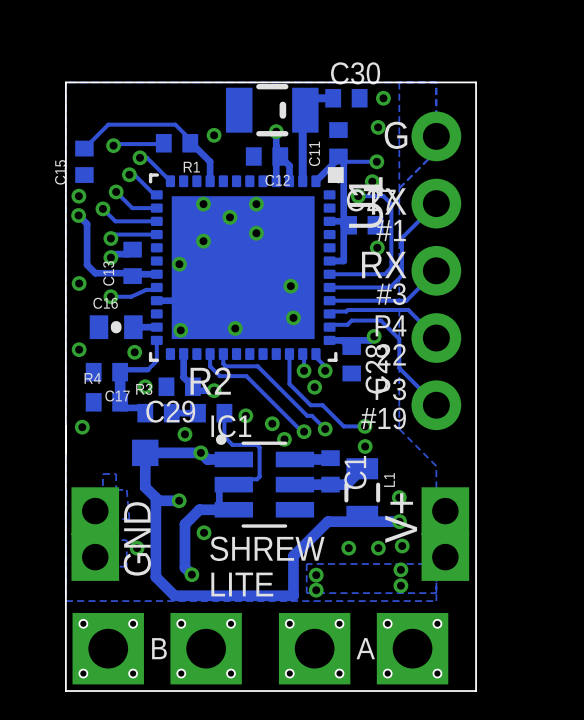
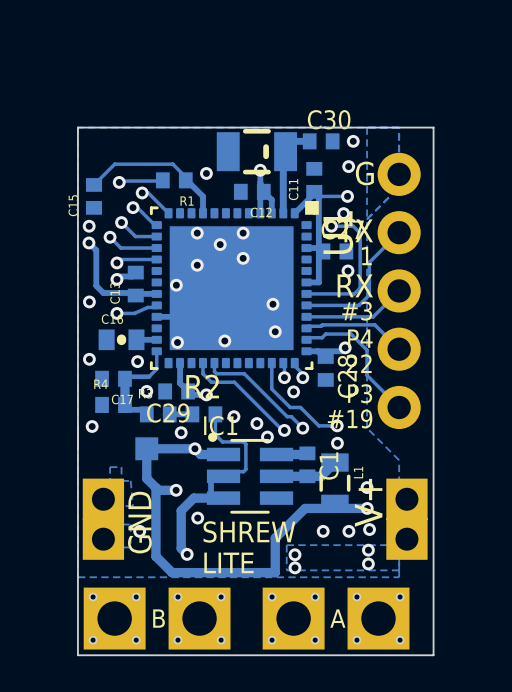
text: #1 (391, 230) -> 1 (366, 256)

